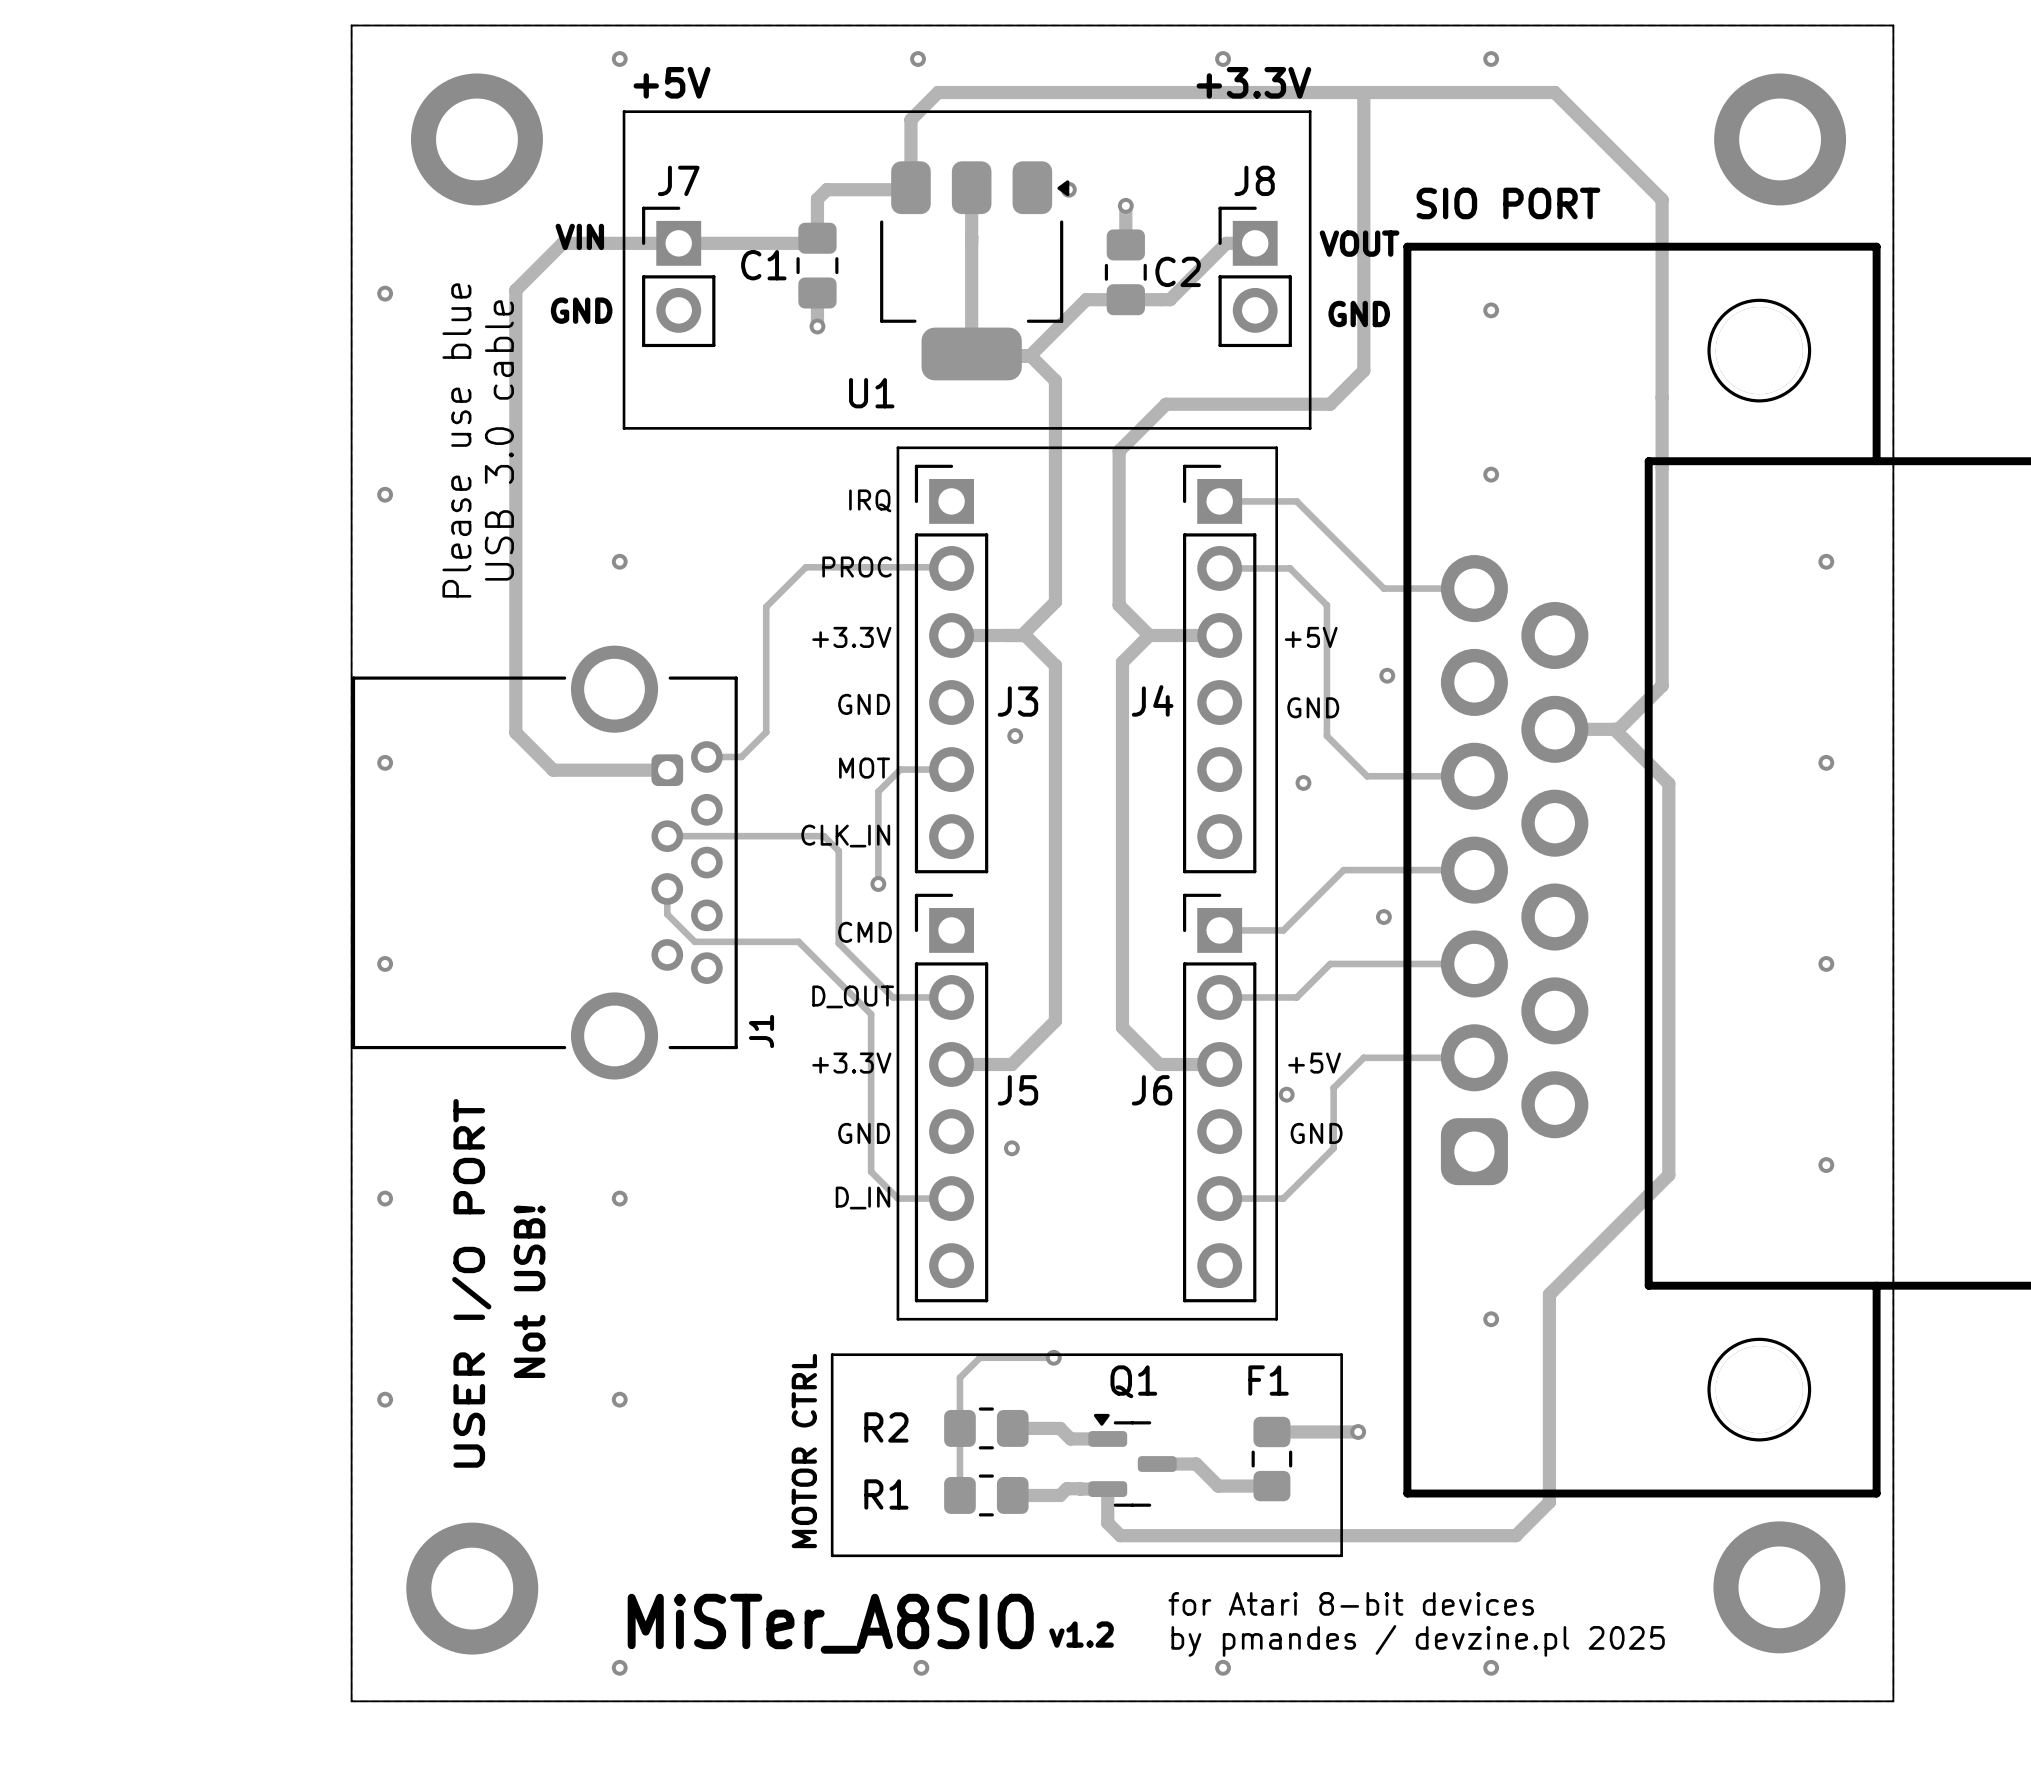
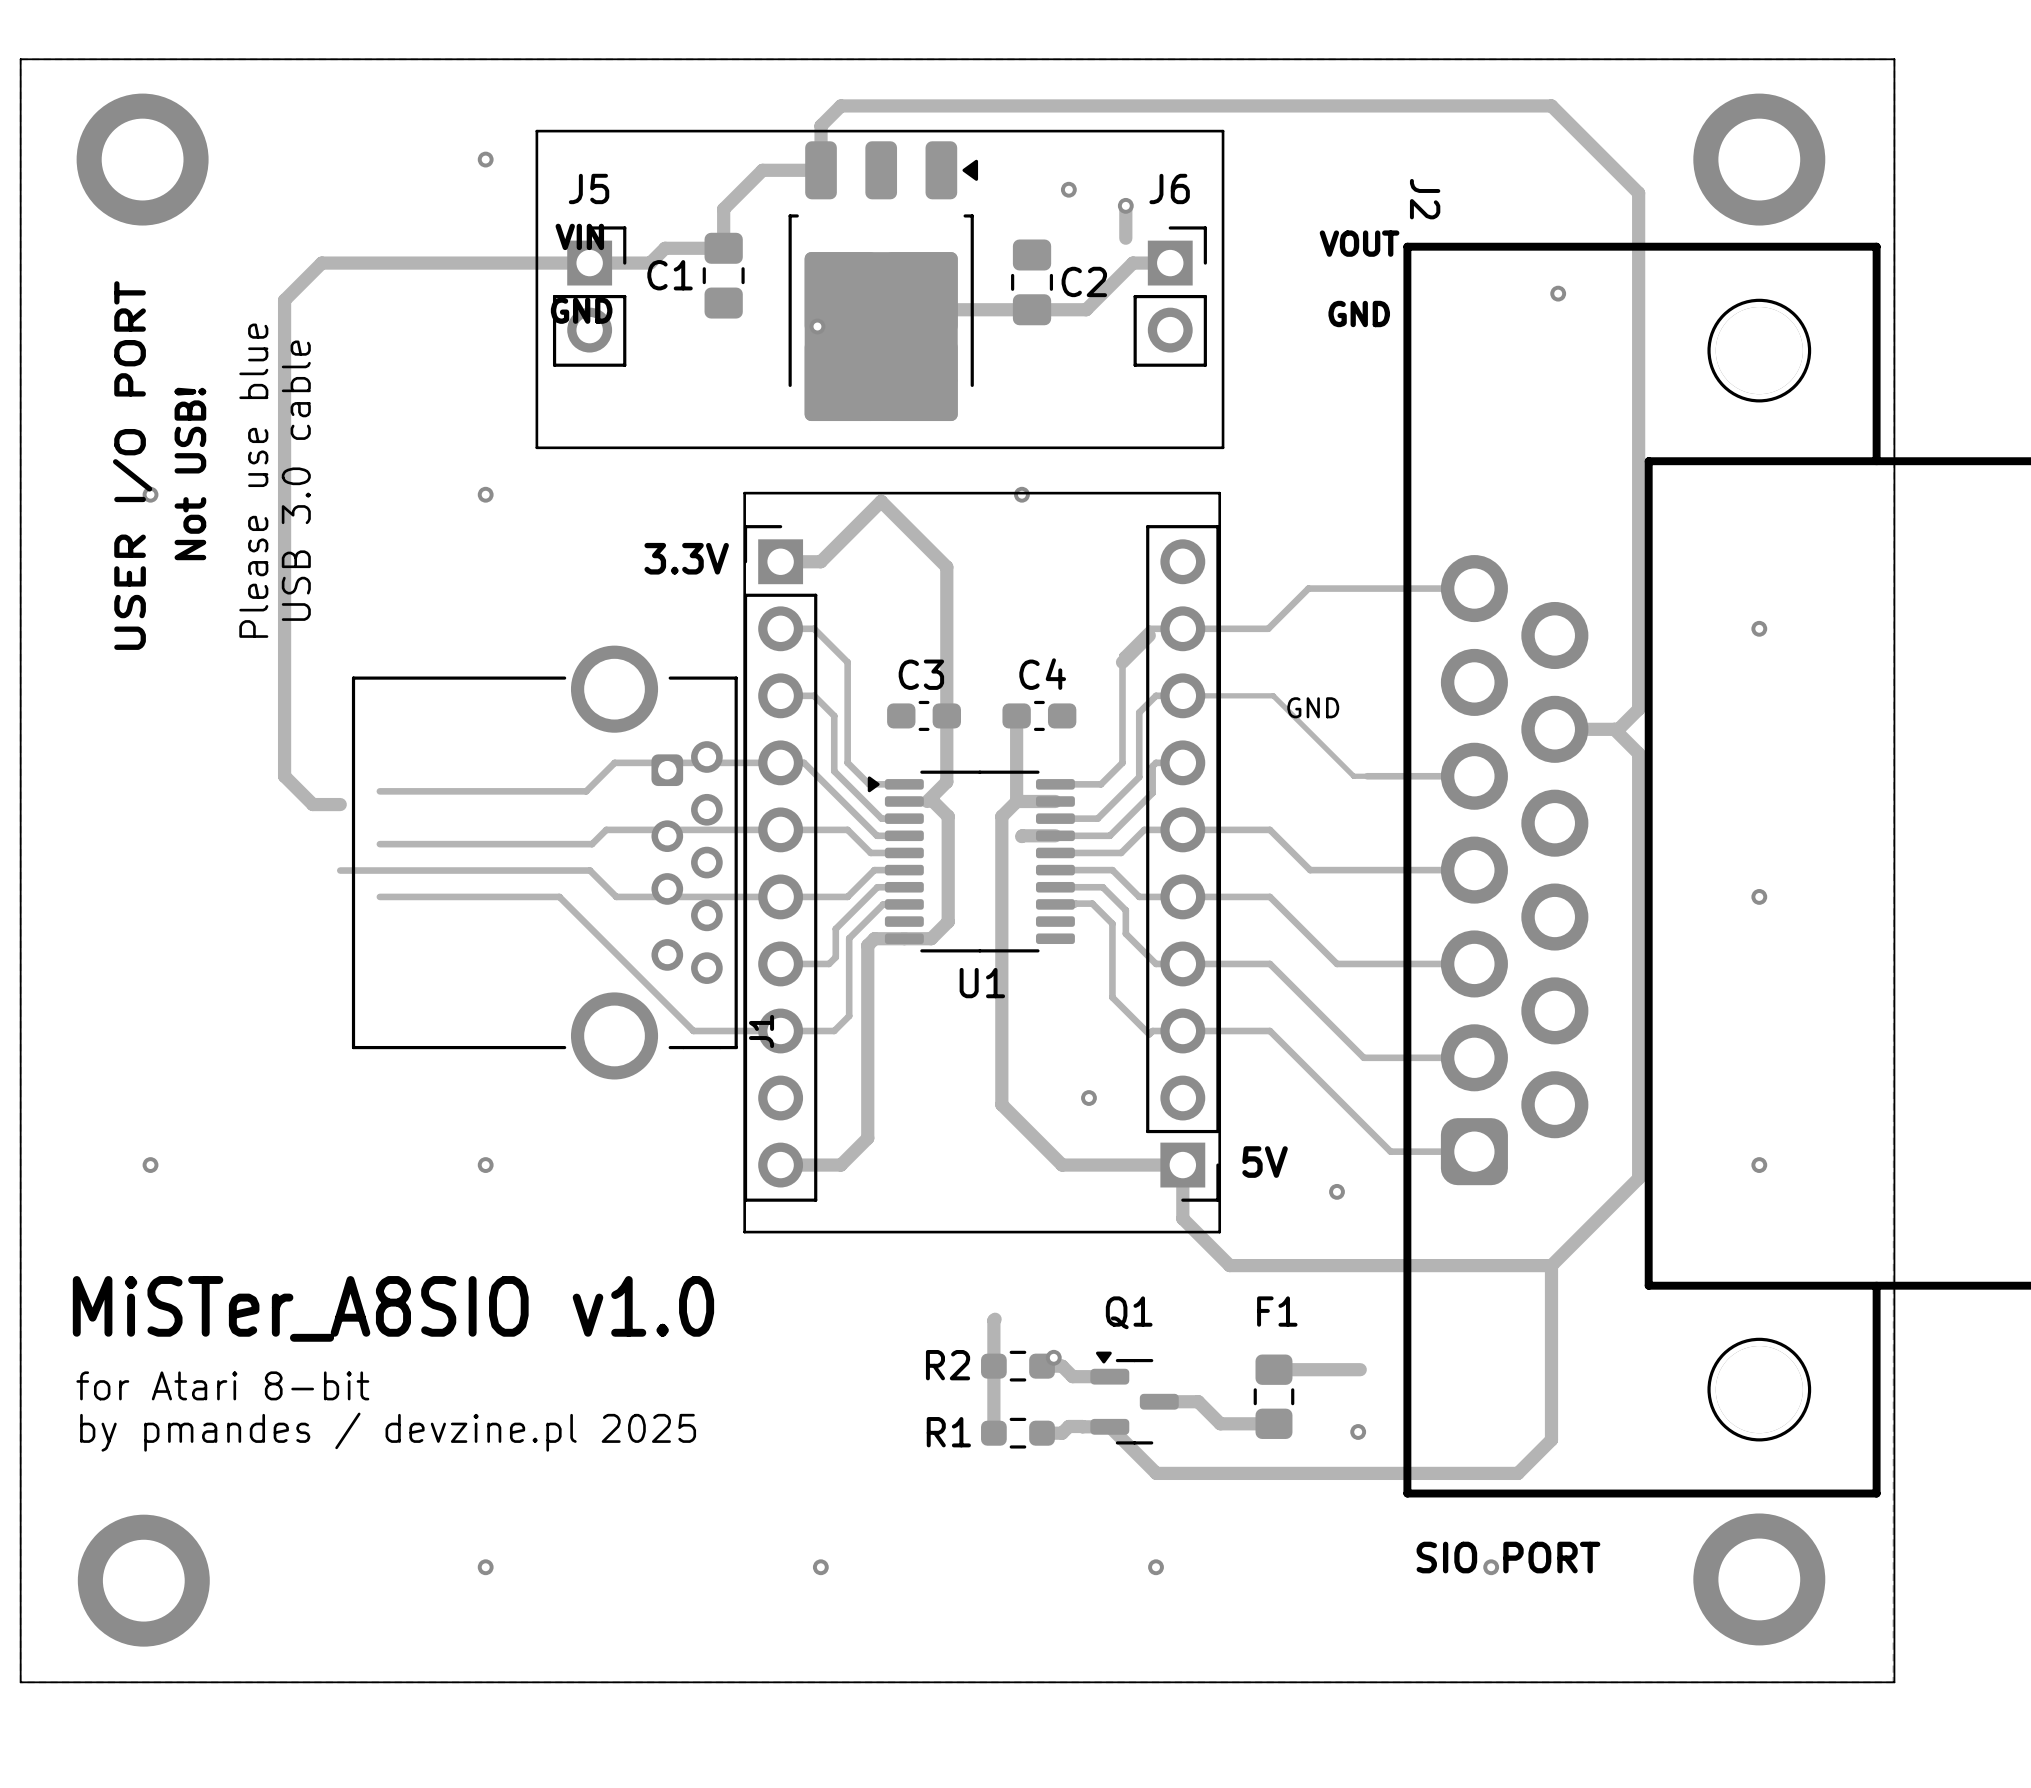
board edge: (351, 25) (1893, 25) (1893, 1701) (351, 1701) (351, 25) -> (20, 59) (20, 1682) (1894, 1682) (1894, 59) (20, 59)
via: (619, 59) -> none
via: (918, 59) -> none
via: (1223, 59) -> none
via: (1491, 59) -> none
via size: [410, 73, 543, 206] -> [477, 151, 494, 168]
text: +5V (672, 82) -> none
text: +3.3V (1253, 82) -> none
track: (1360, 92) (1363, 95) (1363, 370) (1330, 404) (1166, 404) (1119, 451) (1119, 605) (1149, 635) (1219, 635) -> none
line: (624, 111) (1310, 111) (1310, 428) (624, 428) (624, 111) -> none
via position: (1780, 139) -> (1759, 159)
via: none -> (142, 159)
U1 footprint: [880, 161, 1070, 381] -> [867, 770, 1075, 953]
track: none -> (821, 170) (762, 170) (723, 209) (723, 248) (665, 248) (650, 263) (321, 263) (284, 300) (284, 776) (312, 804) (340, 804)
track: (910, 189) (910, 119) (938, 92) (1554, 92) (1662, 199) (1662, 685) (1638, 709) -> (821, 170) (821, 125) (840, 105) (1551, 105) (1638, 193) (1638, 709)
track: (910, 189) (826, 189) (817, 199) (817, 238) (812, 243) (562, 243) (515, 290) (515, 732) (553, 770) (667, 770) -> none
track: (971, 189) (971, 355) (1030, 355) (1055, 380) (1055, 601) (1021, 635) -> none
J2 name: none -> J2 (1425, 199)
text: SIO PORT (1508, 203) -> none
track: (1255, 243) (1226, 243) (1170, 299) (1086, 299) (1029, 355) -> none
track: none -> (1170, 263) (1132, 263) (1086, 309) (938, 309) (921, 292)
C1 position: (817, 265) -> (723, 275)
C2 position: (1125, 272) -> (1032, 282)
J7: (678, 276) -> none
J8: (1255, 276) -> none
part: none -> (883, 281)
via: (385, 293) -> none
via position: (1491, 310) -> (1558, 293)
U1 name position: U1 (871, 393) -> U1 (982, 983)
text position: Please use blue (456, 440) -> Please use blue (253, 480)
text position: USB 3.0 cable (499, 440) -> USB 3.0 cable (296, 480)
line: (897, 447) (897, 1319) (1276, 1319) (1276, 447) (1223, 447) -> (897, 447) (536, 447) (536, 131) (1223, 131) (1223, 447)
text: none -> USER I/O PORT (132, 465)
text: none -> Not USB! (190, 473)
via: (1491, 474) -> none
line: none -> (744, 493) (1219, 493) (1219, 1232) (744, 1232) (744, 493)
via: none -> (150, 494)
via: (385, 494) -> none
via: none -> (485, 494)
via: none -> (1021, 494)
text: IRQ (870, 500) -> none
track: (1219, 501) (1296, 501) (1383, 588) -> (1122, 662) (1122, 655) (1149, 628) (1268, 628) (1308, 588) (1383, 588)
text: none -> 3.3V (686, 558)
via: (619, 561) -> none
track: none -> (780, 561) (820, 561) (881, 501) (946, 567) (946, 781) (927, 801) (933, 801) (948, 816) (948, 921) (931, 938) (874, 938) (867, 945) (867, 1138) (840, 1165) (780, 1165)
via: (1826, 561) -> none
text: PROC (857, 567) -> none
track: (951, 568) (805, 567) (766, 606) (766, 732) (741, 757) (706, 757) -> none
track: (1219, 568) (1290, 568) (1326, 605) (1326, 736) (1367, 776) -> (1055, 818) (1097, 818) (1139, 777) (1139, 712) (1156, 695) (1273, 695) (1353, 776) (1367, 776)
track: none -> (780, 628) (814, 628) (847, 662) (847, 762) (869, 784) (904, 784)
via: none -> (1759, 628)
track: (951, 635) (1025, 635) (1055, 665) (1055, 1020) (1011, 1064) (951, 1064) -> none
text: +3.3V (851, 637) -> none
text: +5V (1311, 637) -> none
track width: thick (1122, 662) (1122, 762) -> thin (1122, 662) (1122, 762)
J3: (951, 669) -> none
J4: (1219, 669) -> none
via: (1387, 675) -> none
track: none -> (780, 695) (814, 695) (834, 715) (834, 771) (881, 818) (904, 818)
text: GND (864, 704) -> none
C3: none -> (924, 715)
track: none -> (1016, 715) (1016, 801)
C4: none -> (1039, 715)
via: (1015, 736) -> none
track: (1638, 753) (1668, 783) (1668, 1175) (1549, 1294) (1549, 1502) (1515, 1535) (1120, 1535) (1107, 1523) (1107, 1489) (1080, 1489) -> (1638, 753) (1638, 1178) (1551, 1265)
via: (385, 762) -> none
track: (1122, 762) (1122, 1027) (1159, 1064) (1219, 1064) -> (1122, 762) (1101, 784) (1055, 784)
track: none -> (1182, 762) (1156, 762) (1152, 766) (1152, 793) (1109, 835) (1021, 836)
via: (1826, 762) -> none
text: MOT (864, 768) -> none
track: (951, 769) (900, 769) (878, 791) (878, 883) -> none
via: (1303, 782) -> none
track: none -> (379, 791) (586, 791) (614, 762) (804, 762) (876, 835) (904, 835)
track: none -> (1055, 801) (1016, 801) (1001, 816) (1001, 1104) (1062, 1165) (1182, 1165) (1182, 1218) (1229, 1265) (1551, 1265)
track: (667, 836) (823, 836) (838, 851) (838, 943) (892, 997) (951, 997) -> none
text: CLK_IN (845, 836) -> none
track: none -> (379, 844) (592, 844) (606, 829) (847, 829) (870, 852) (904, 852)
part: none -> (780, 863)
part: none -> (1182, 863)
track: none -> (904, 870) (874, 870) (847, 896) (616, 896) (590, 870) (340, 870)
track: (1343, 870) (1283, 930) (1219, 930) -> (1343, 870) (1310, 870) (1269, 829) (1144, 829) (1121, 852) (1055, 852)
via: (878, 883) -> none
track: none -> (904, 887) (877, 887) (835, 928) (835, 957) (829, 963) (780, 963)
track: (667, 888) (667, 914) (694, 941) (798, 941) (871, 1014) (871, 1171) (897, 1198) (951, 1198) -> none
J5 footprint: [914, 893, 989, 1303] -> [552, 226, 627, 367]
J6 footprint: [1183, 893, 1257, 1303] -> [1133, 226, 1207, 367]
track: none -> (379, 896) (559, 896) (693, 1030) (834, 1030) (849, 1016) (849, 938) (883, 904) (904, 904)
via: none -> (1759, 896)
track: none -> (1055, 904) (1092, 903) (1112, 923) (1112, 997) (1149, 1034) (1152, 1030) (1269, 1030) (1390, 1151) (1474, 1151)
via: (1383, 917) -> none
text: CMD (865, 932) -> none
via: (385, 963) -> none
track: (1336, 963) (1330, 963) (1296, 997) (1219, 997) -> (1336, 963) (1269, 896) (1139, 896) (1112, 870) (1055, 870)
via: (1826, 963) -> none
text: D_OUT (853, 996) -> none
track: (1363, 1057) (1333, 1087) (1333, 1148) (1283, 1198) (1219, 1198) -> (1363, 1057) (1269, 963) (1156, 963) (1125, 933) (1125, 910) (1102, 887) (1055, 887)
text: +3.3V (851, 1063) -> none
text: +5V (1314, 1063) -> none
J5 name position: J5 (1017, 1090) -> J5 (589, 188)
J6 name position: J6 (1152, 1090) -> J6 (1169, 188)
via: (1286, 1094) -> none
text: GND (864, 1133) -> none
text: GND (1316, 1133) -> none
via position: (1011, 1148) -> (1088, 1098)
text: none -> 5V (1265, 1162)
via: none -> (150, 1165)
via: none -> (485, 1165)
via position: (1826, 1165) -> (1759, 1165)
via: none -> (1336, 1191)
via: (385, 1198) -> none
via: (619, 1198) -> none
text: D_IN (862, 1198) -> none
track: none -> (1551, 1265) (1551, 1439) (1517, 1473) (1156, 1473) (1109, 1426) (1082, 1426)
text: USER I/O PORT (471, 1283) -> none
text: Not USB! (529, 1291) -> none
text: none -> MiSTer_A8SIO v1.0 (393, 1308)
track: none -> (995, 1319) (993, 1433)
via: (1491, 1319) -> none
line: (832, 1354) (1341, 1354) (1341, 1555) (832, 1555) (832, 1354) -> none
track: (1053, 1357) (979, 1357) (959, 1377) (959, 1495) -> none
track: none -> (1042, 1366) (1062, 1366) (1072, 1376) (1109, 1376)
F1 name position: F1 (1268, 1380) -> F1 (1277, 1311)
Q1 name position: Q1 (1133, 1381) -> Q1 (1129, 1312)
text: none -> for Atari 8-bit (222, 1385)
via: (385, 1399) -> none
via: (619, 1399) -> none
R2 footprint: [944, 1407, 1029, 1450] -> [981, 1350, 1055, 1382]
track: none -> (1082, 1426) (1068, 1426) (1062, 1433) (1042, 1433)
track: (1012, 1428) (1060, 1428) (1070, 1438) (1107, 1438) -> none
track: (1271, 1431) (1358, 1431) -> (1273, 1369) (1360, 1369)
text: none -> by pmandes / devzine.pl 2025 (388, 1432)
text: MOTOR CTRL (804, 1451) -> none
F1 position: (1271, 1459) -> (1273, 1396)
Q1 position: (1132, 1460) -> (1134, 1398)
track: (1157, 1464) (1196, 1464) (1218, 1486) (1271, 1486) -> (1159, 1401) (1198, 1401) (1220, 1423) (1273, 1423)
R1 footprint: [944, 1474, 1029, 1517] -> [981, 1417, 1055, 1449]
track: (1080, 1488) (1066, 1488) (1060, 1495) (1012, 1495) -> none
via size: [406, 1522, 539, 1655] -> [477, 1559, 494, 1576]
text: none -> SIO PORT (1508, 1557)
via: none -> (820, 1567)
via: none -> (143, 1580)
via position: (1779, 1587) -> (1759, 1579)
text: for Atari 8-bit devices (1351, 1603) -> none
text: MiSTer_A8SIO (830, 1623) -> none
text: v1.2 (1081, 1634) -> none
text: by pmandes / devzine.pl 2025 (1418, 1640) -> none
via: (619, 1667) -> none
via: (921, 1667) -> none
via position: (1223, 1667) -> (1156, 1567)
via position: (1491, 1667) -> (1491, 1567)

